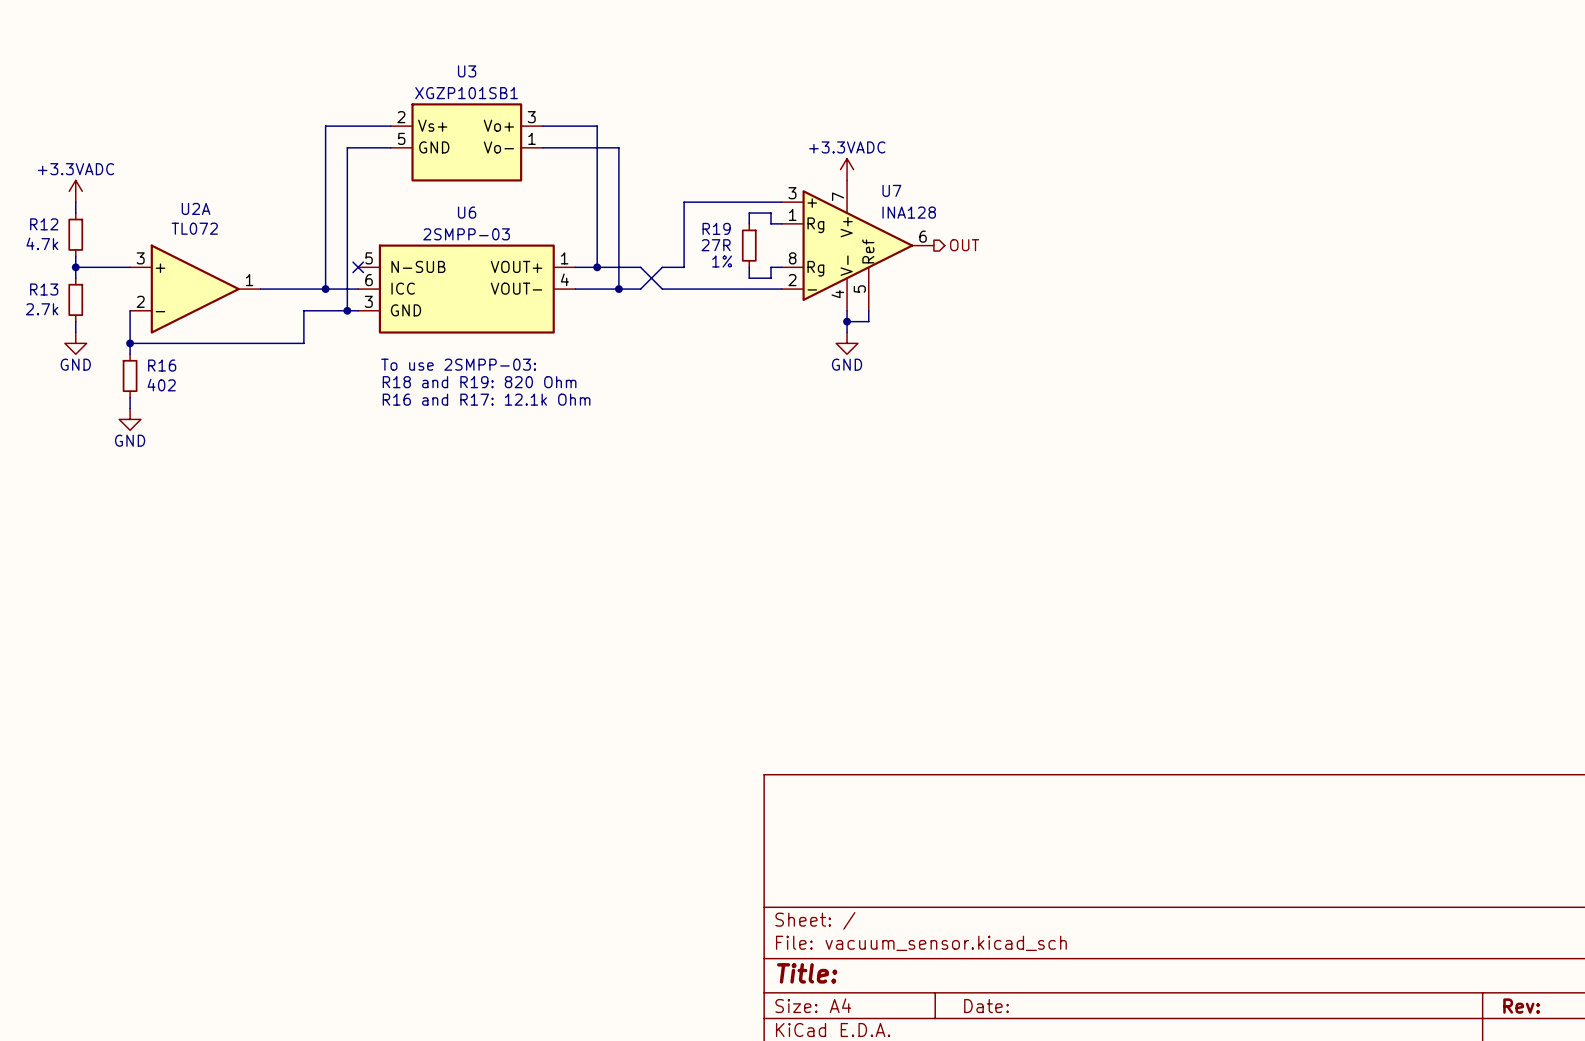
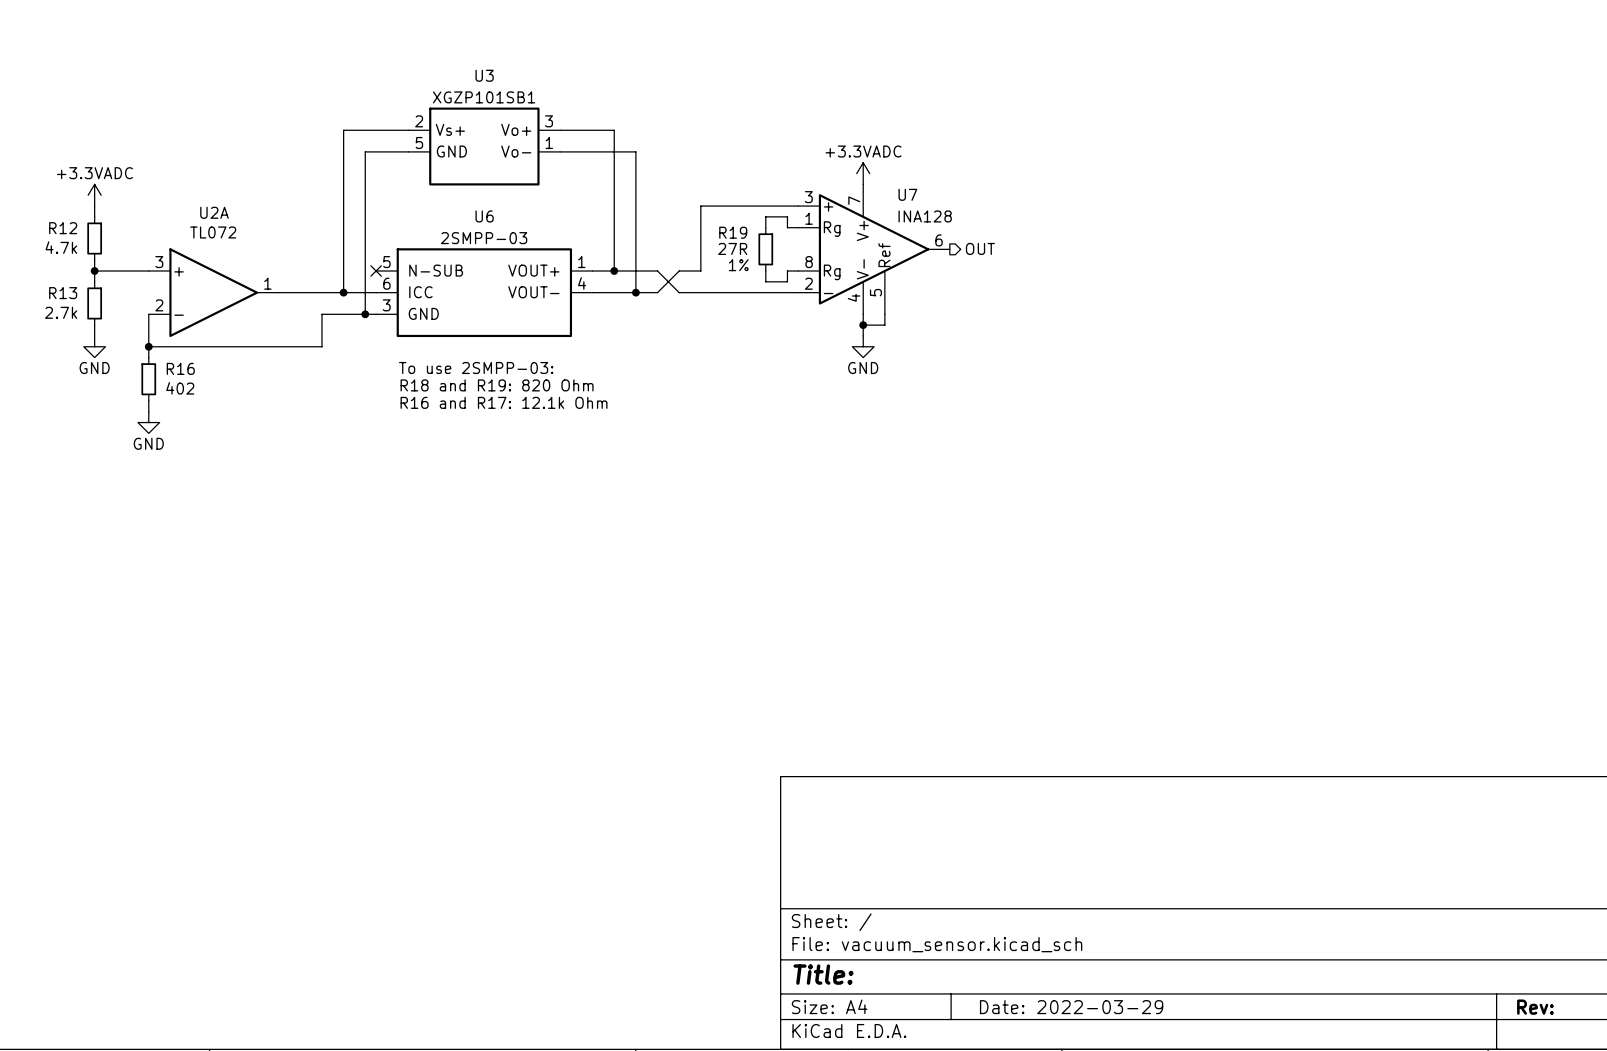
title block: Date: (986, 1006) -> Date: 2022-03-29 (1071, 1007)

